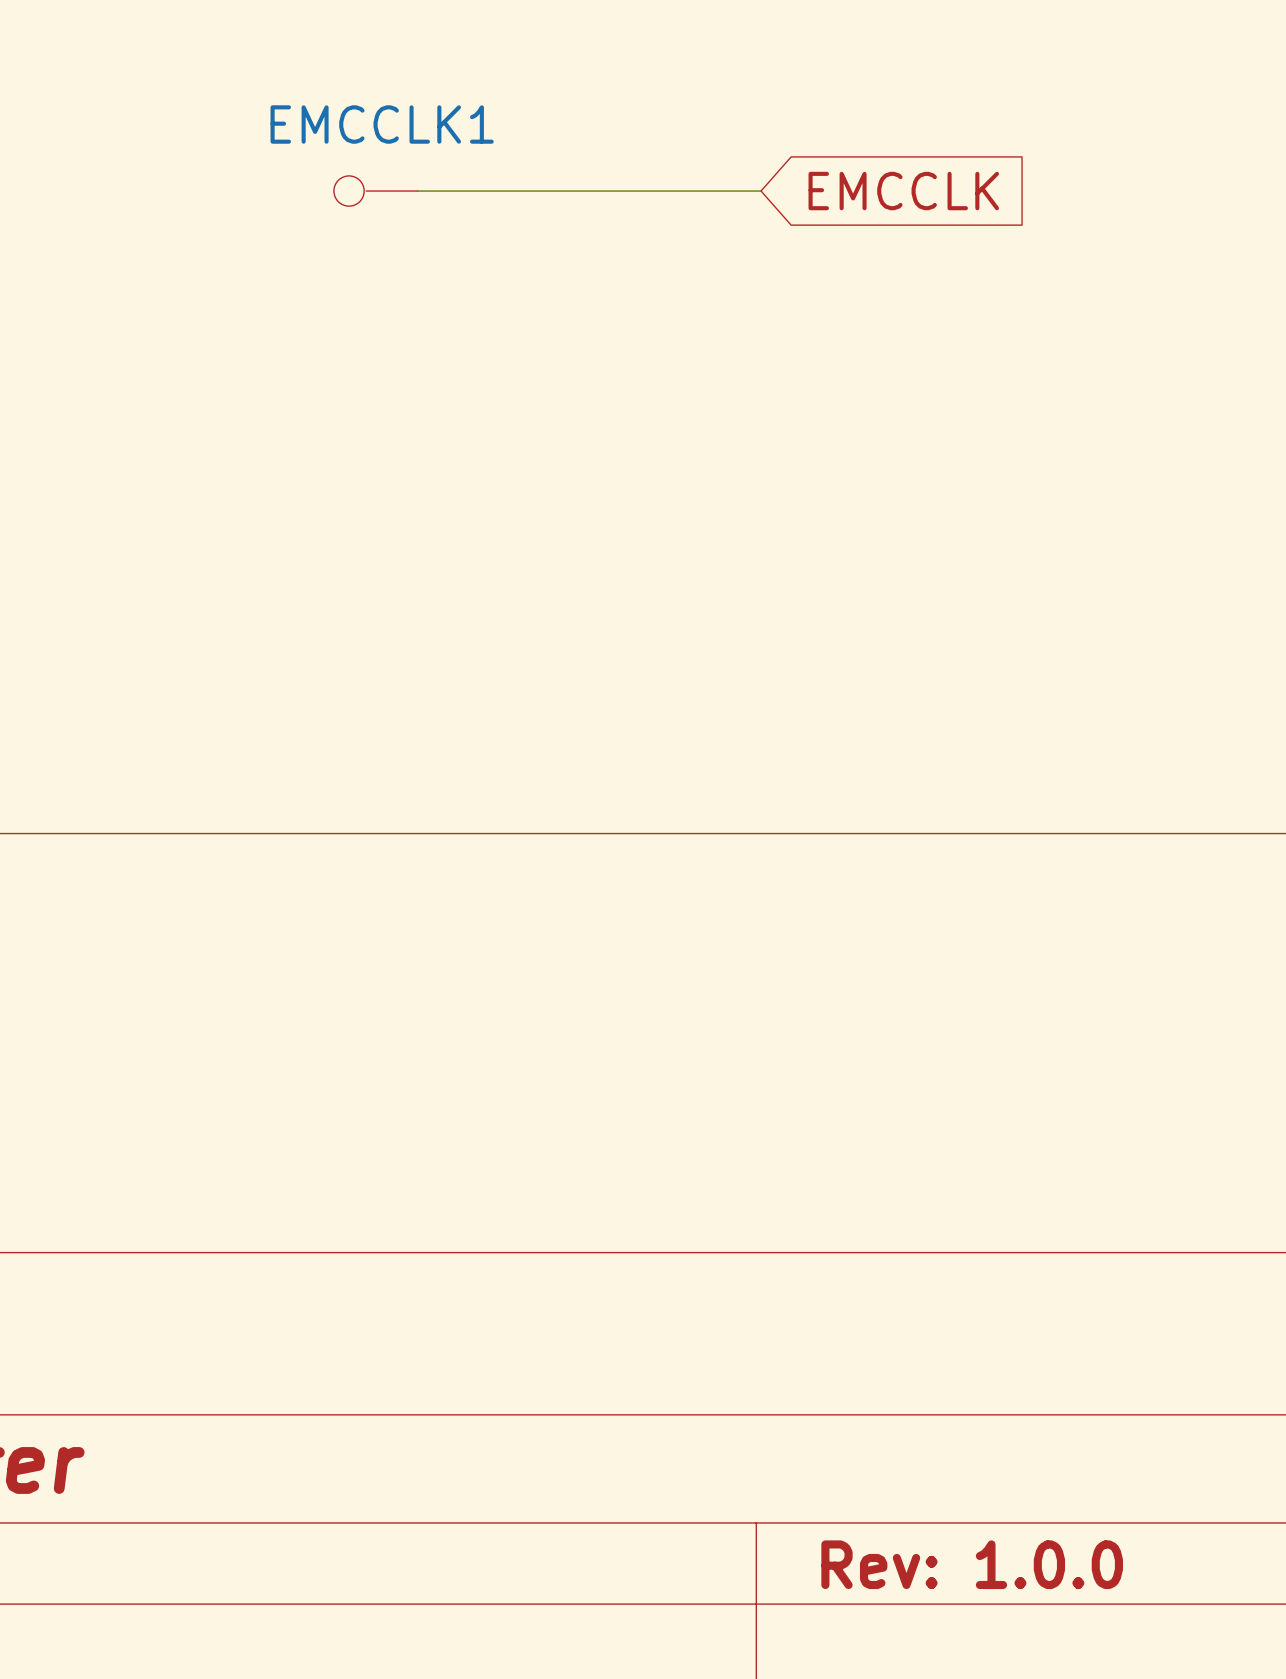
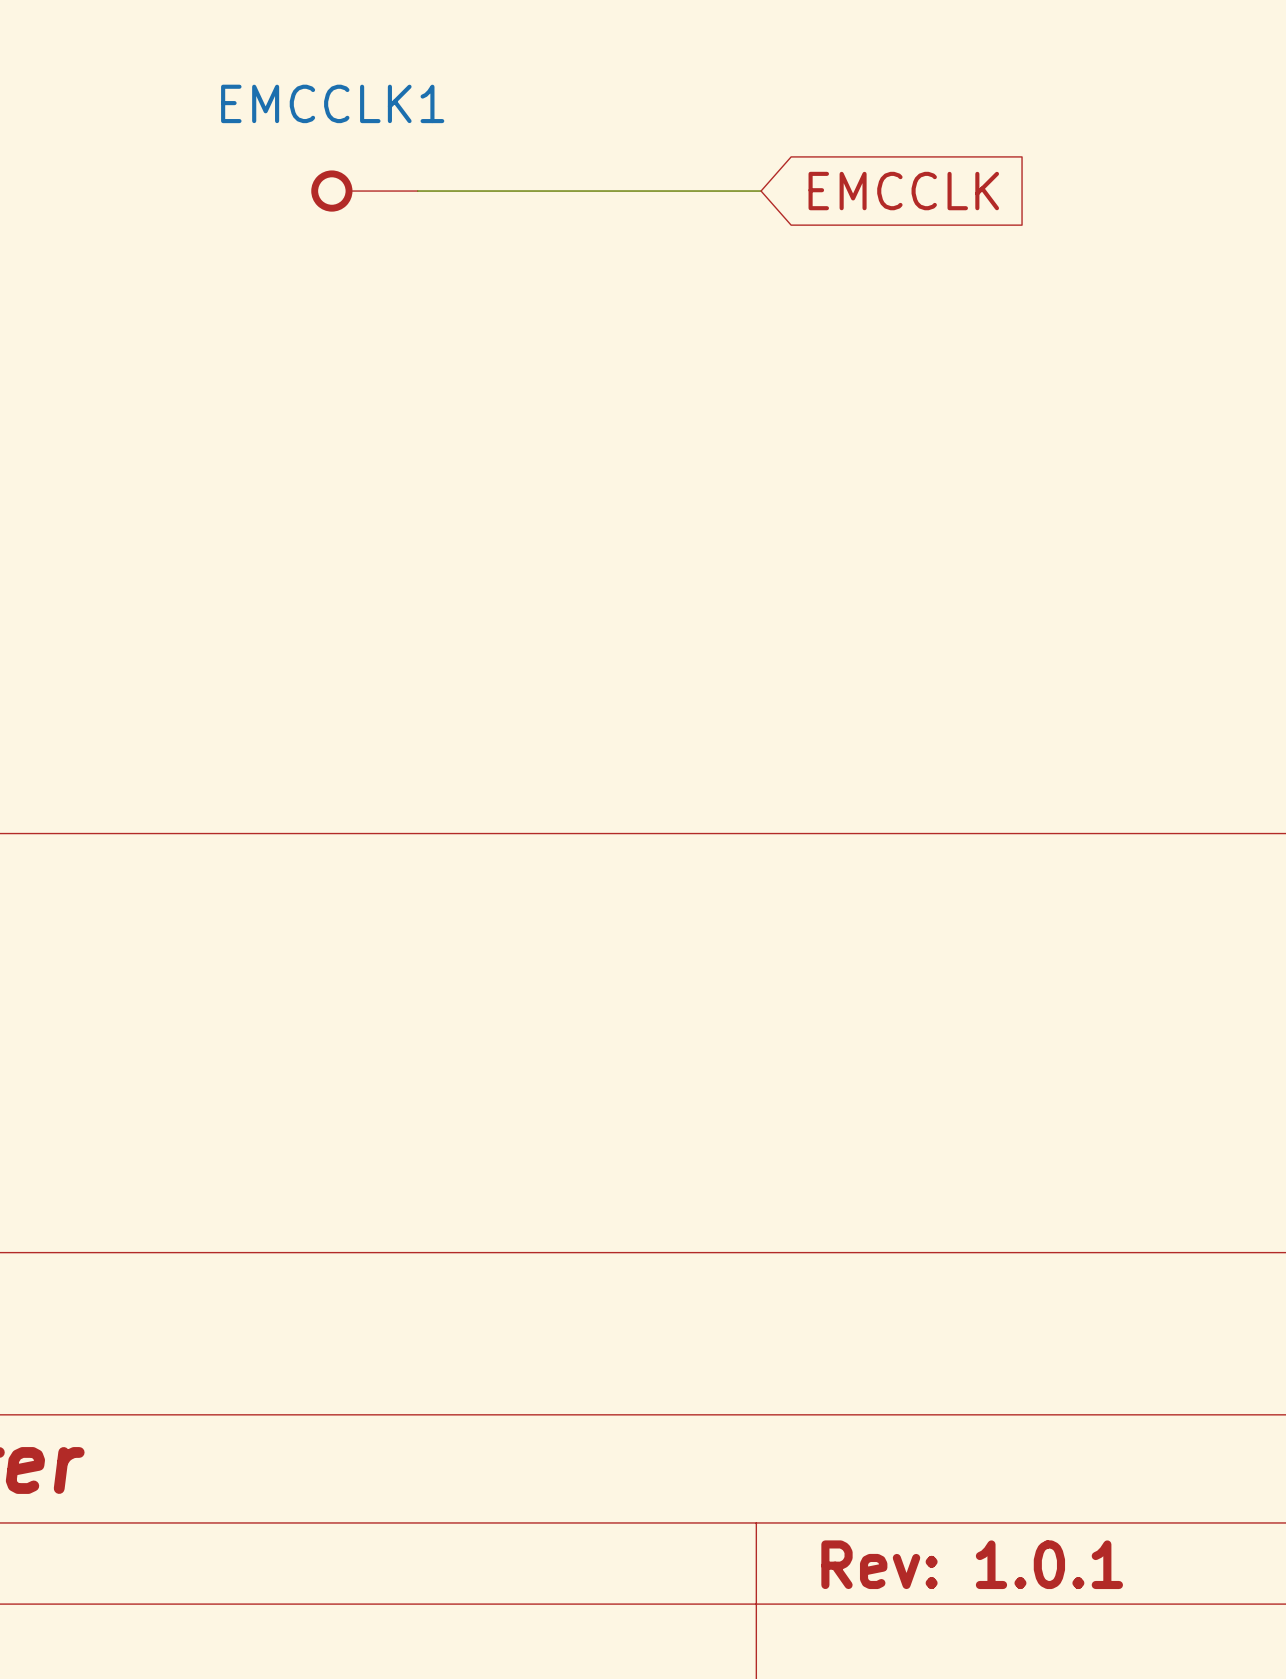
EMCCLK1 name position: EMCCLK1 (382, 124) -> EMCCLK1 (332, 103)
EMCCLK1 symbol: [333, 175, 418, 207] -> [311, 170, 418, 212]
title block: Rev: 1.0.0 (972, 1564) -> Rev: 1.0.1 (972, 1564)

